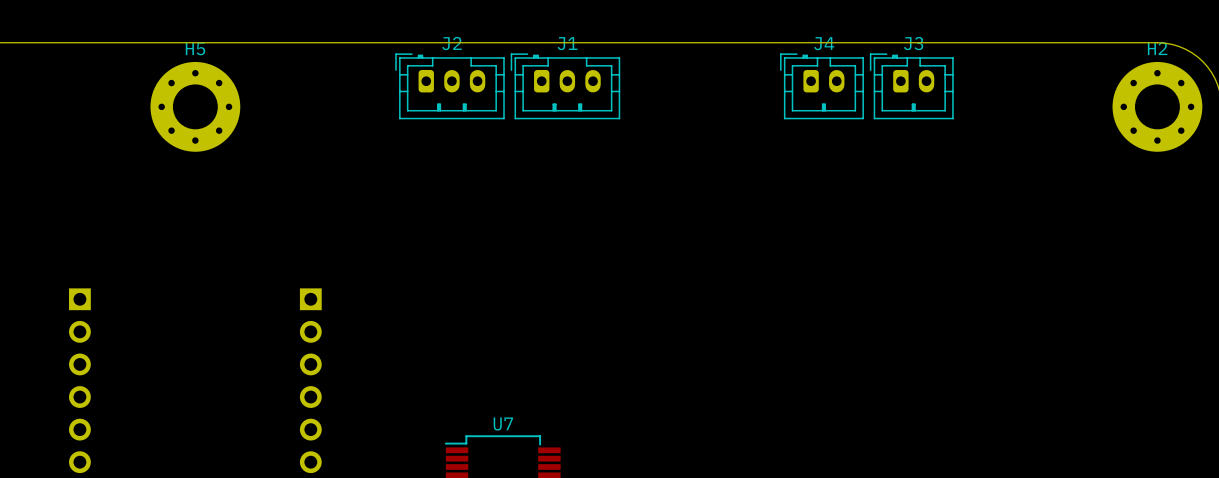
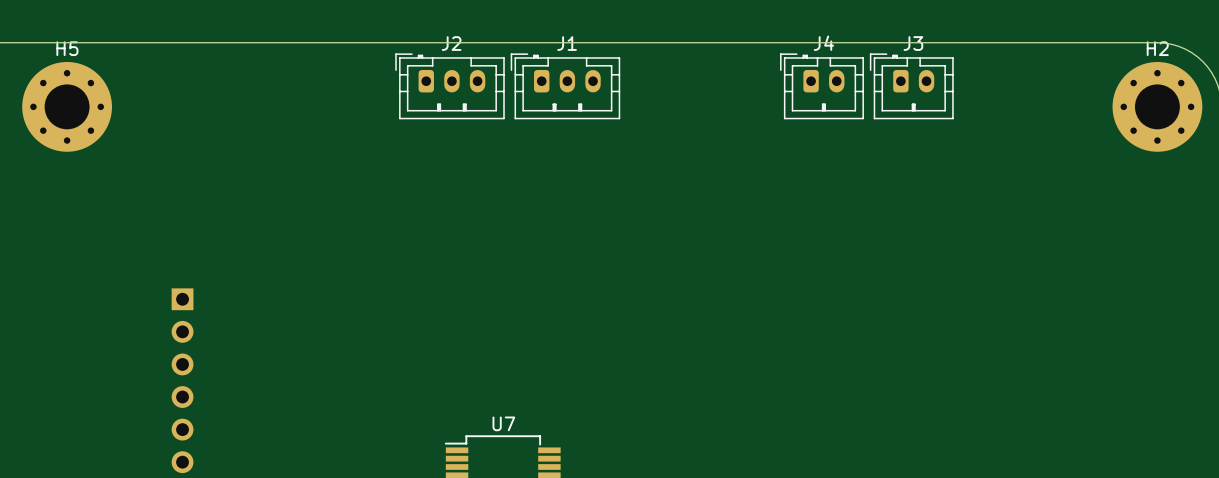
H5 position: (195, 106) -> (67, 106)
part: (79, 380) -> none
part: none -> (182, 380)
part: (310, 380) -> none

